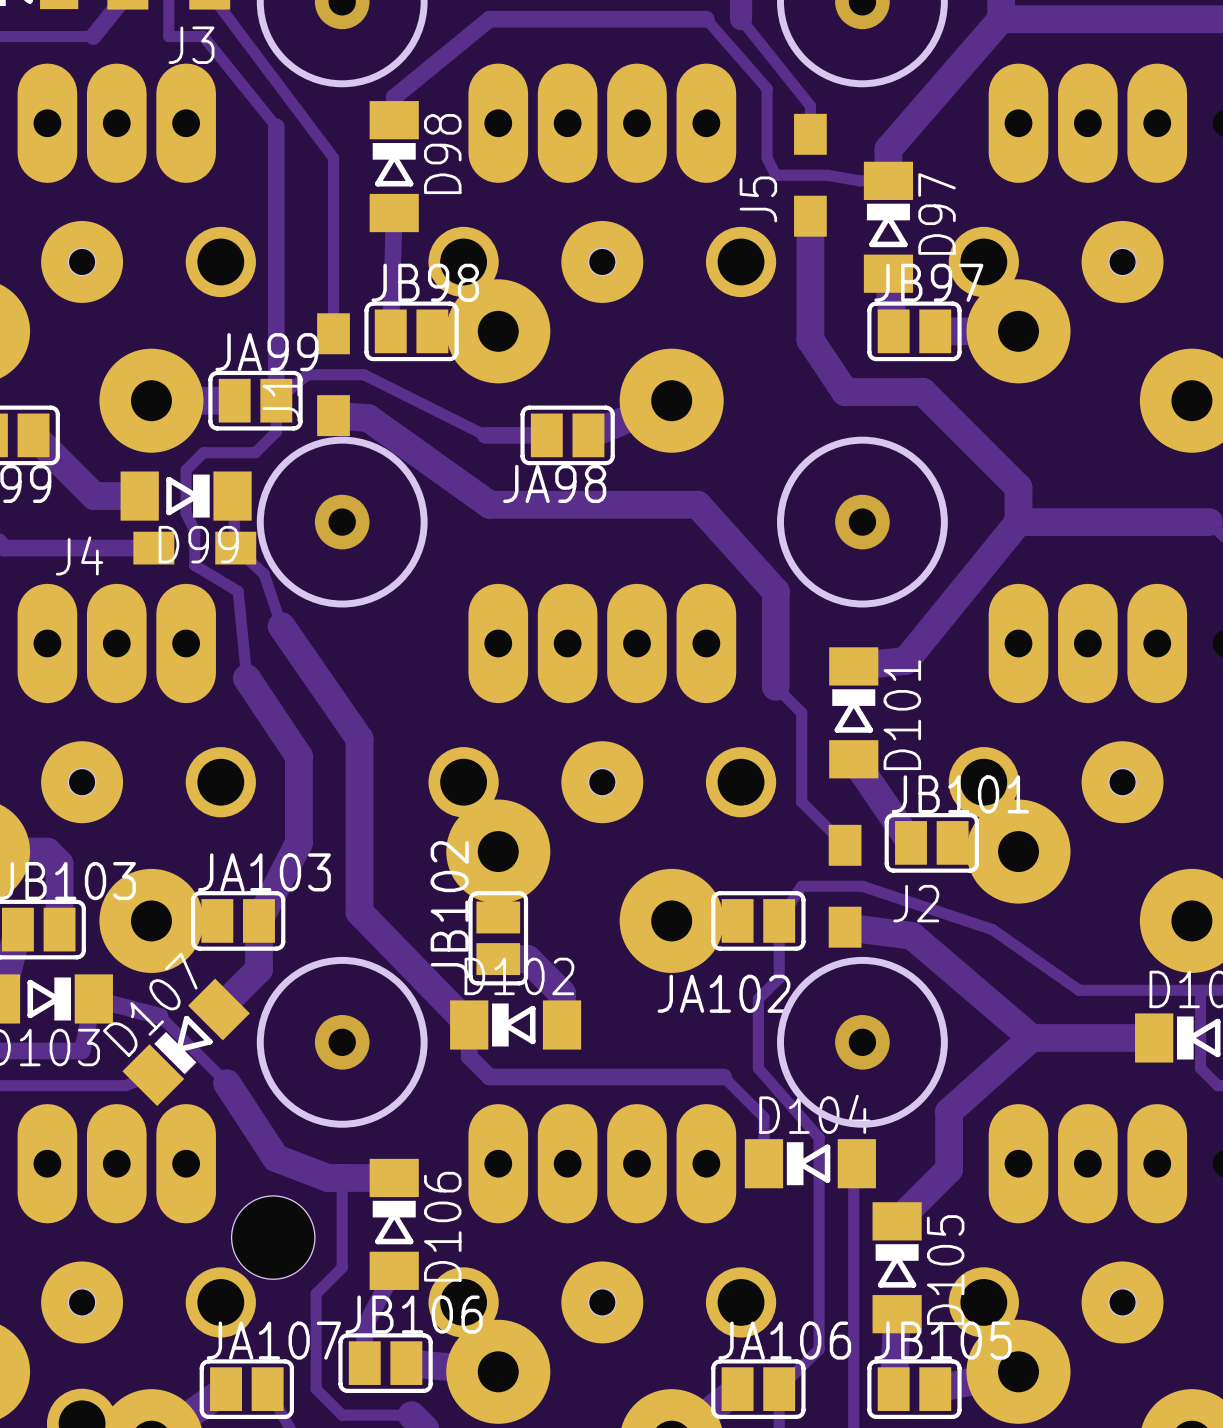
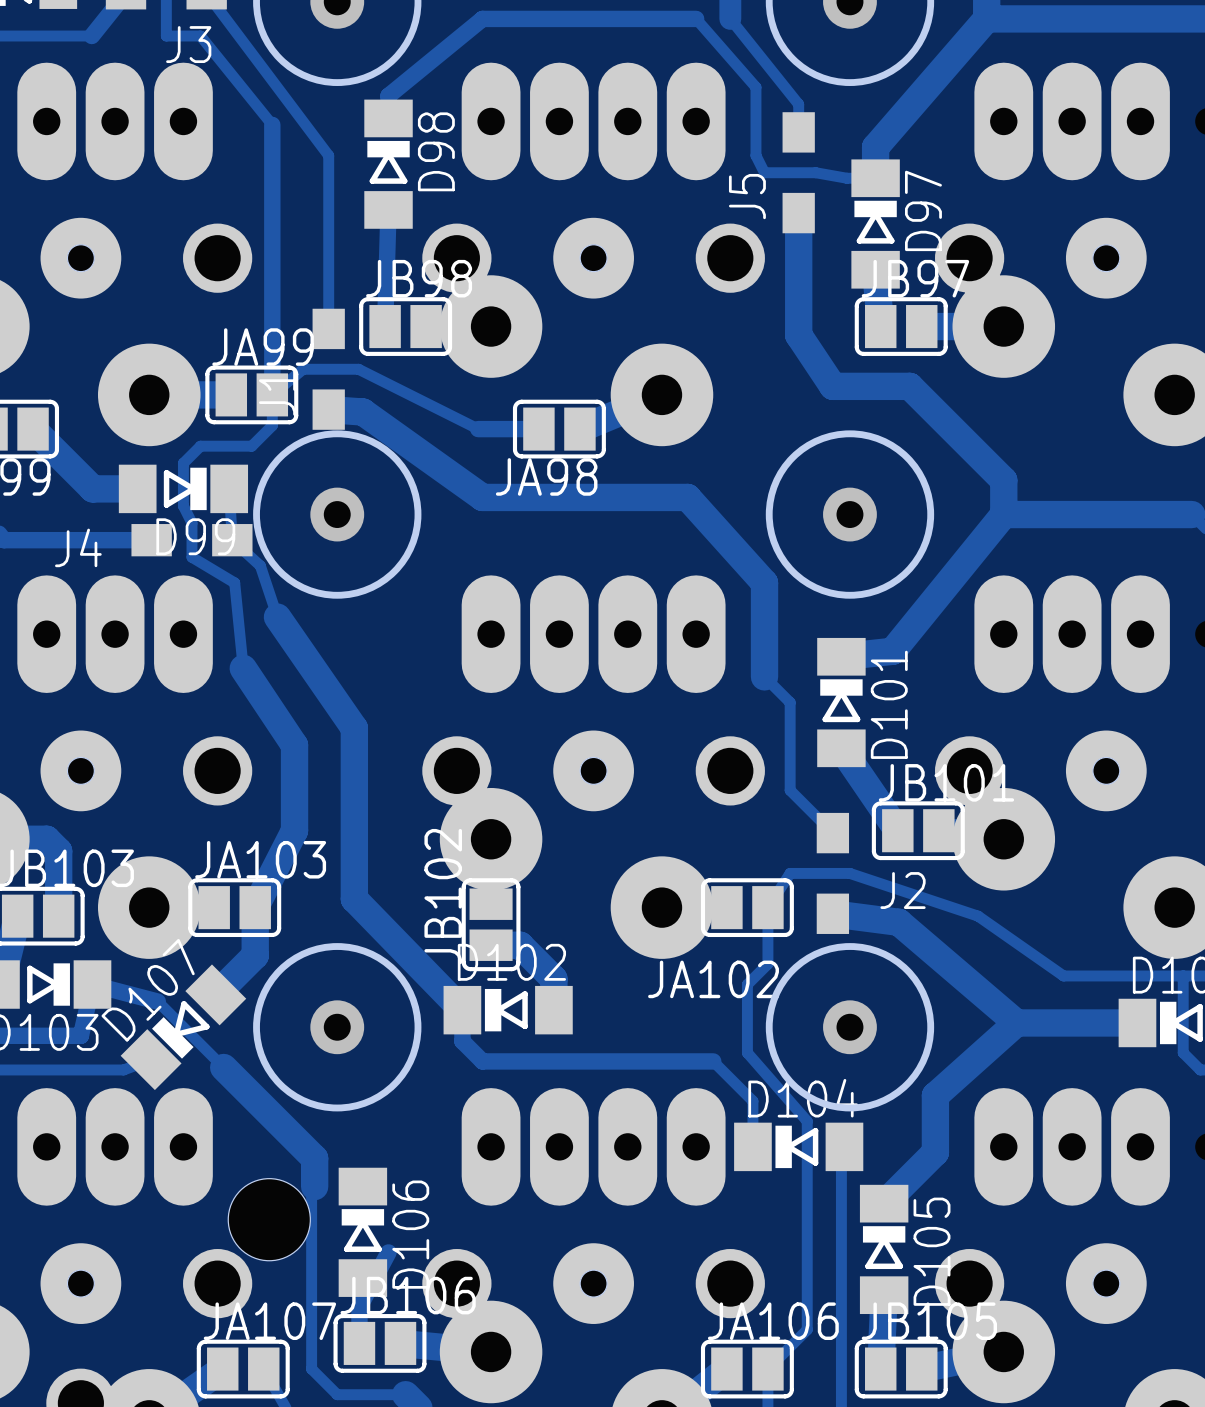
track: (226, 1083) (275, 1158) (327, 1177) (394, 1177) -> (223, 1067) (314, 1158) (314, 1186) (311, 1189) (311, 1275)
track: (342, 1177) (342, 1267) (316, 1293) -> none
D106 position: (394, 1224) -> (362, 1232)

